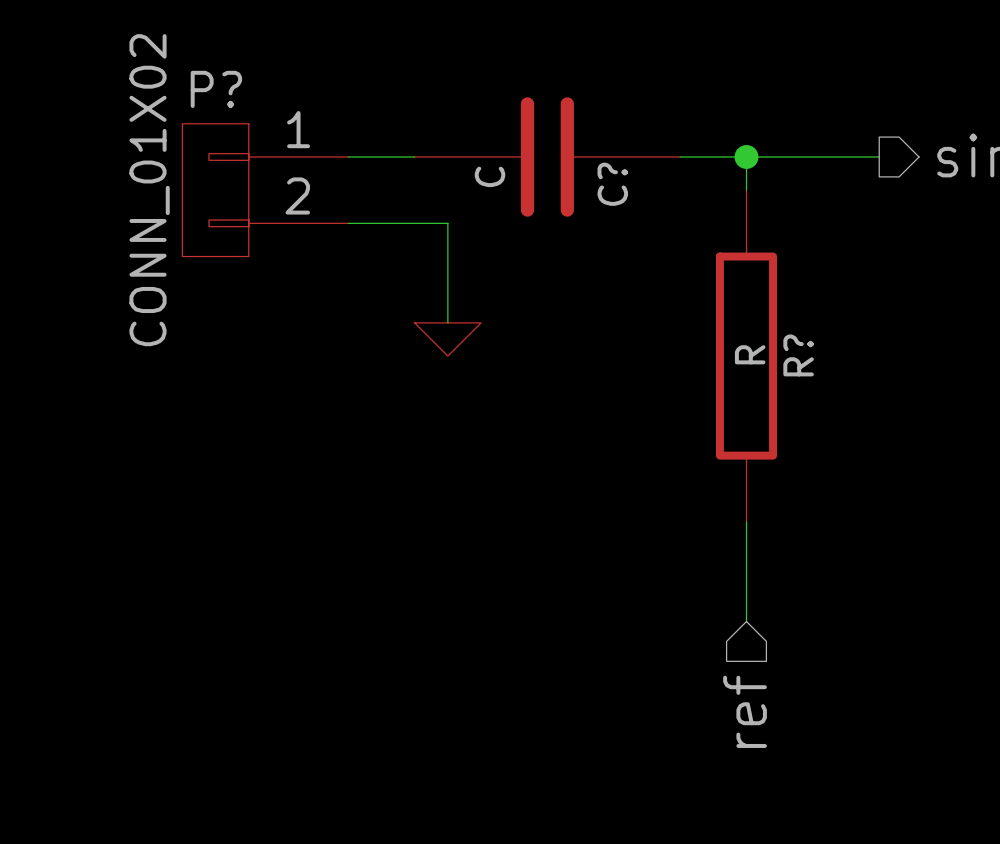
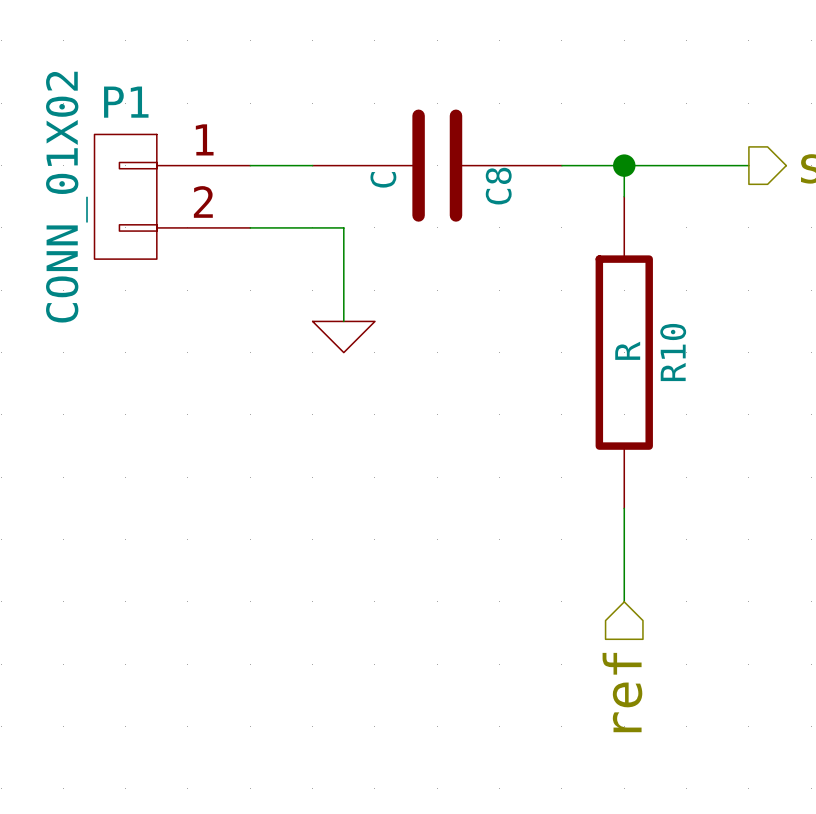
P? name: P? (216, 89) -> P1 (126, 102)
C? name: C? (612, 184) -> C8 (498, 186)
R? name: R? (798, 355) -> R10 (673, 352)

